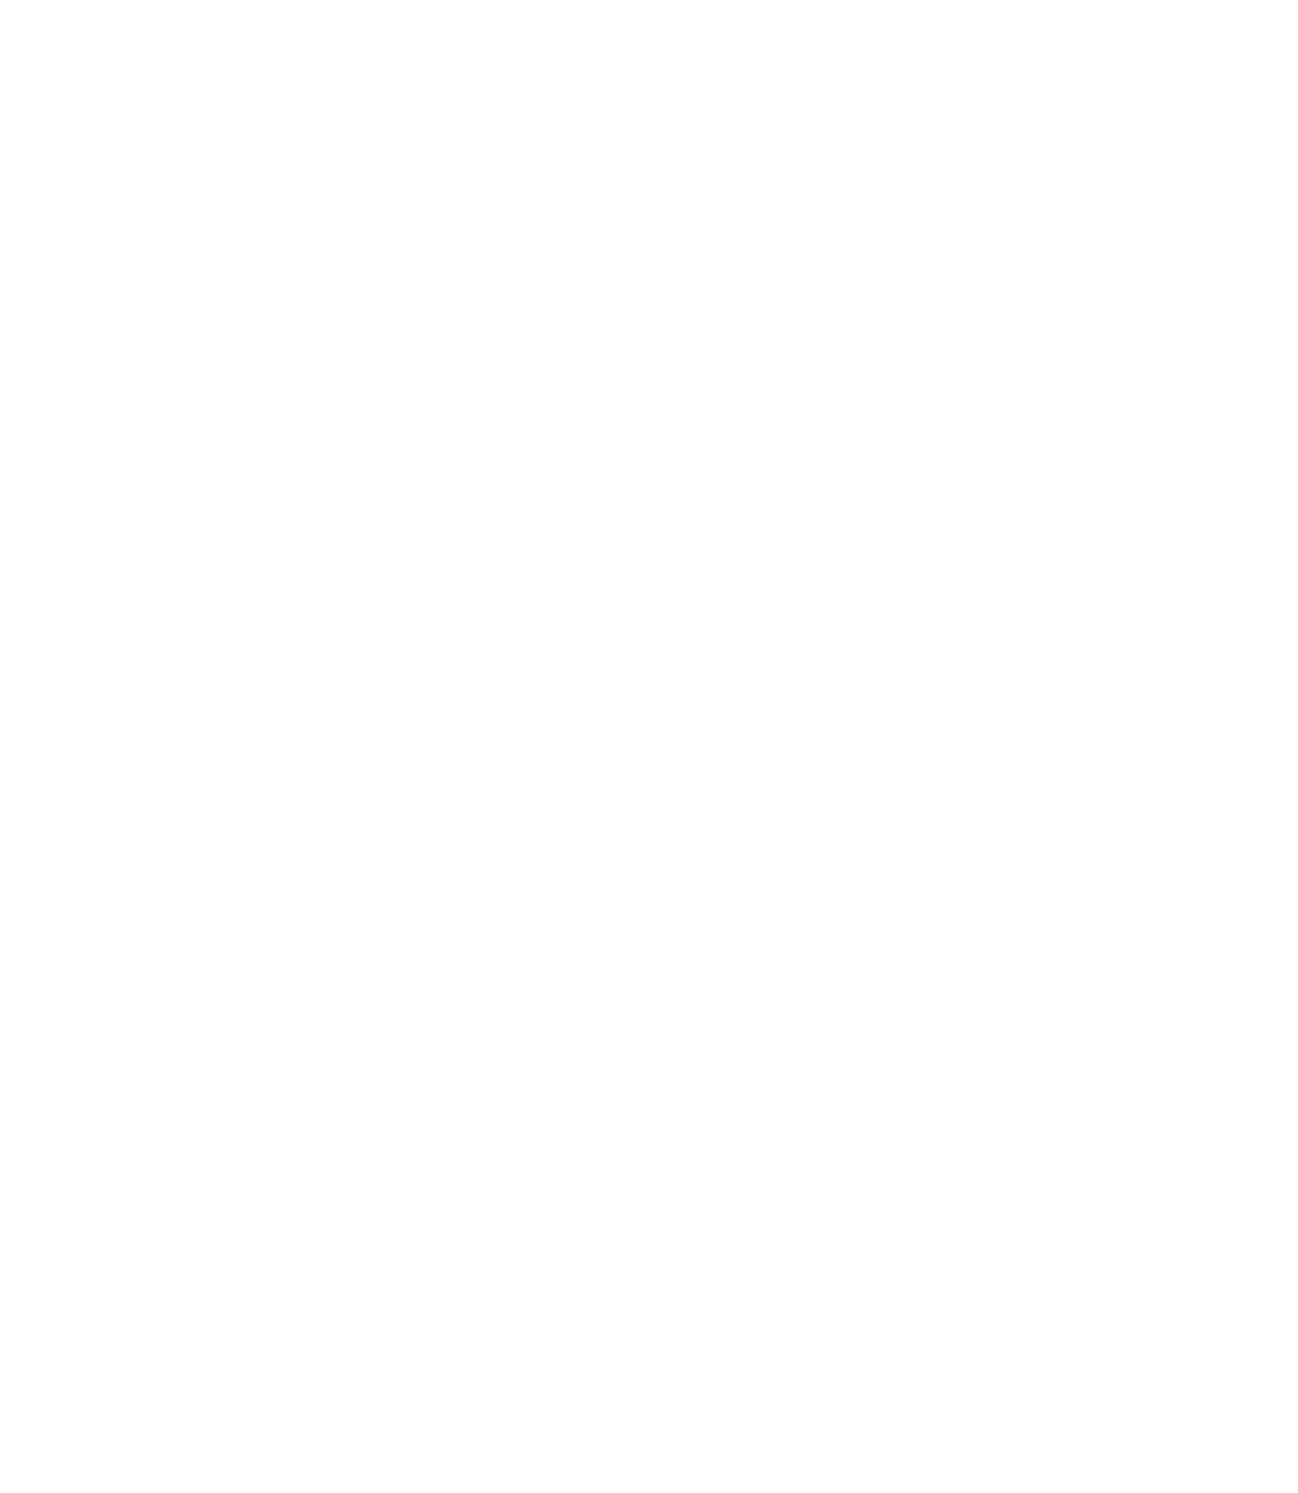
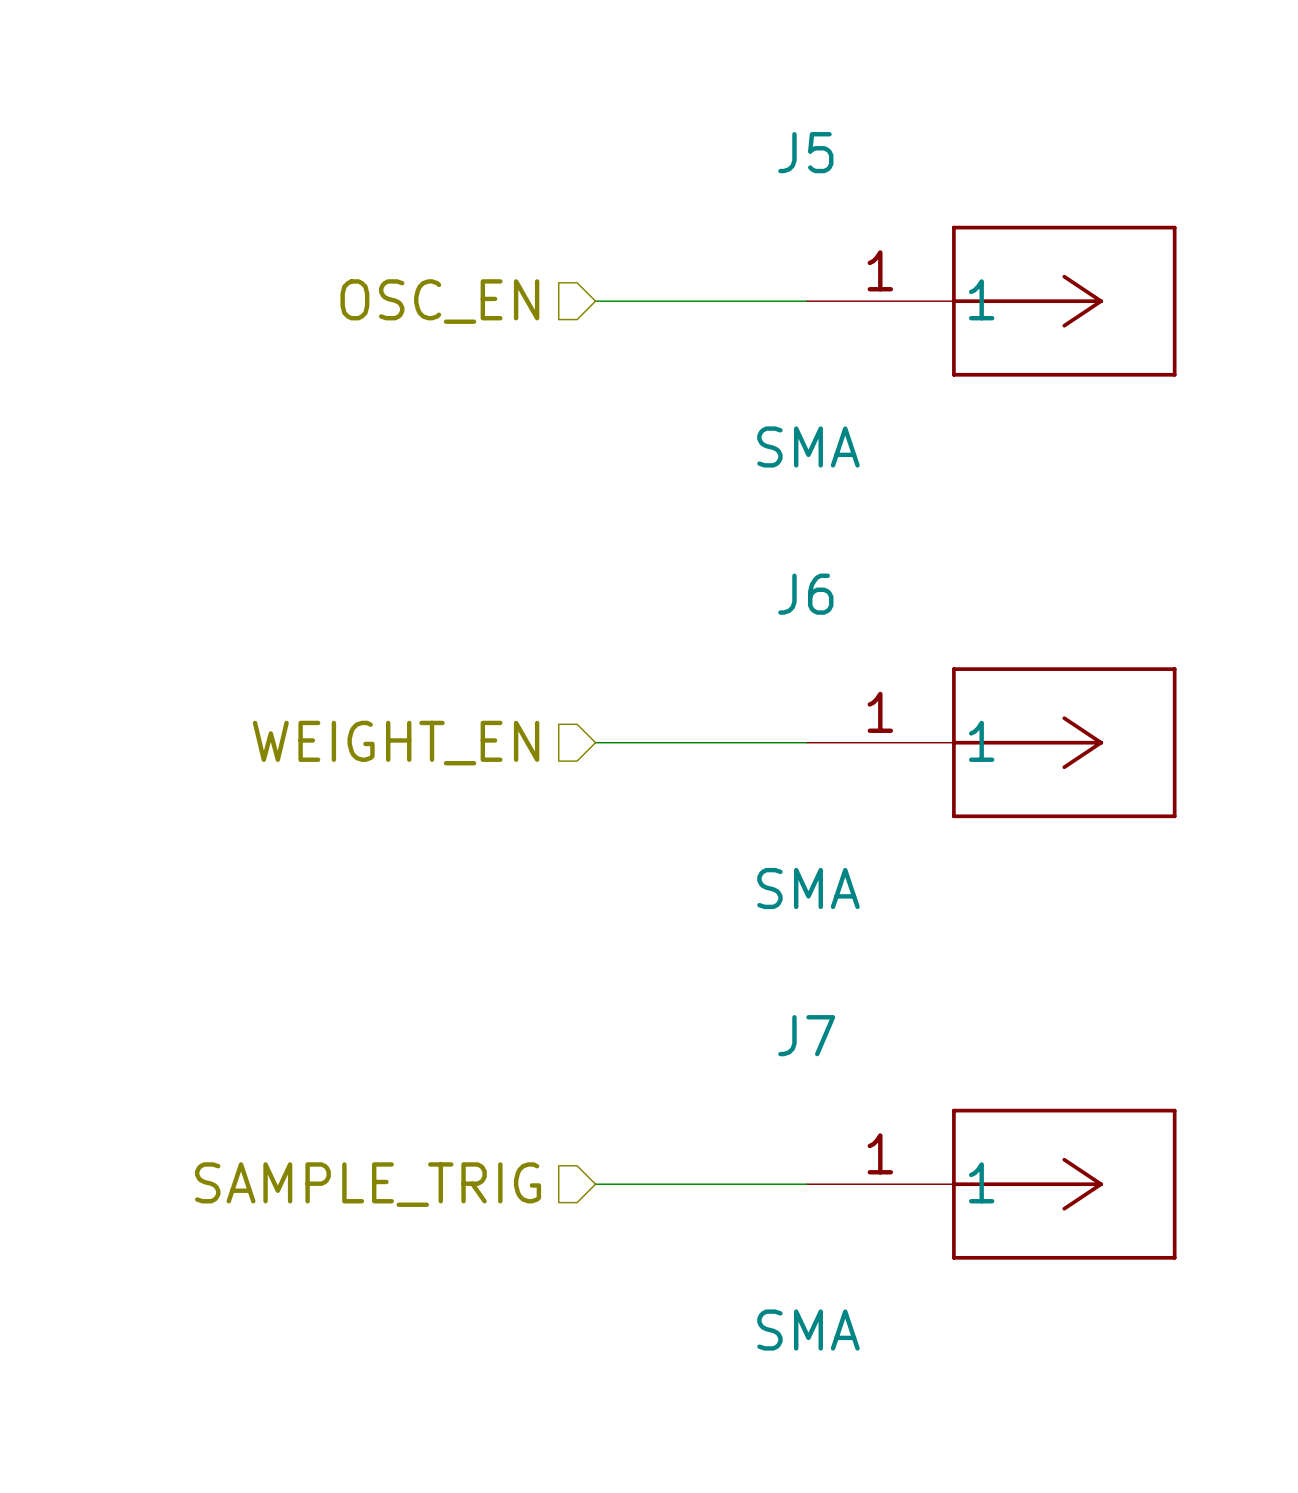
hierarchical label: none -> OSC_EN (439, 301)
wire: none -> (595, 301) (806, 301)
J5: none -> SMA (991, 301)
wire: none -> (595, 742) (806, 742)
J6: none -> SMA (991, 742)
hierarchical label: none -> WEIGHT_EN (396, 743)
hierarchical label: none -> SAMPLE_TRIG (368, 1184)
wire: none -> (595, 1184) (806, 1184)
J7: none -> SMA (991, 1184)

